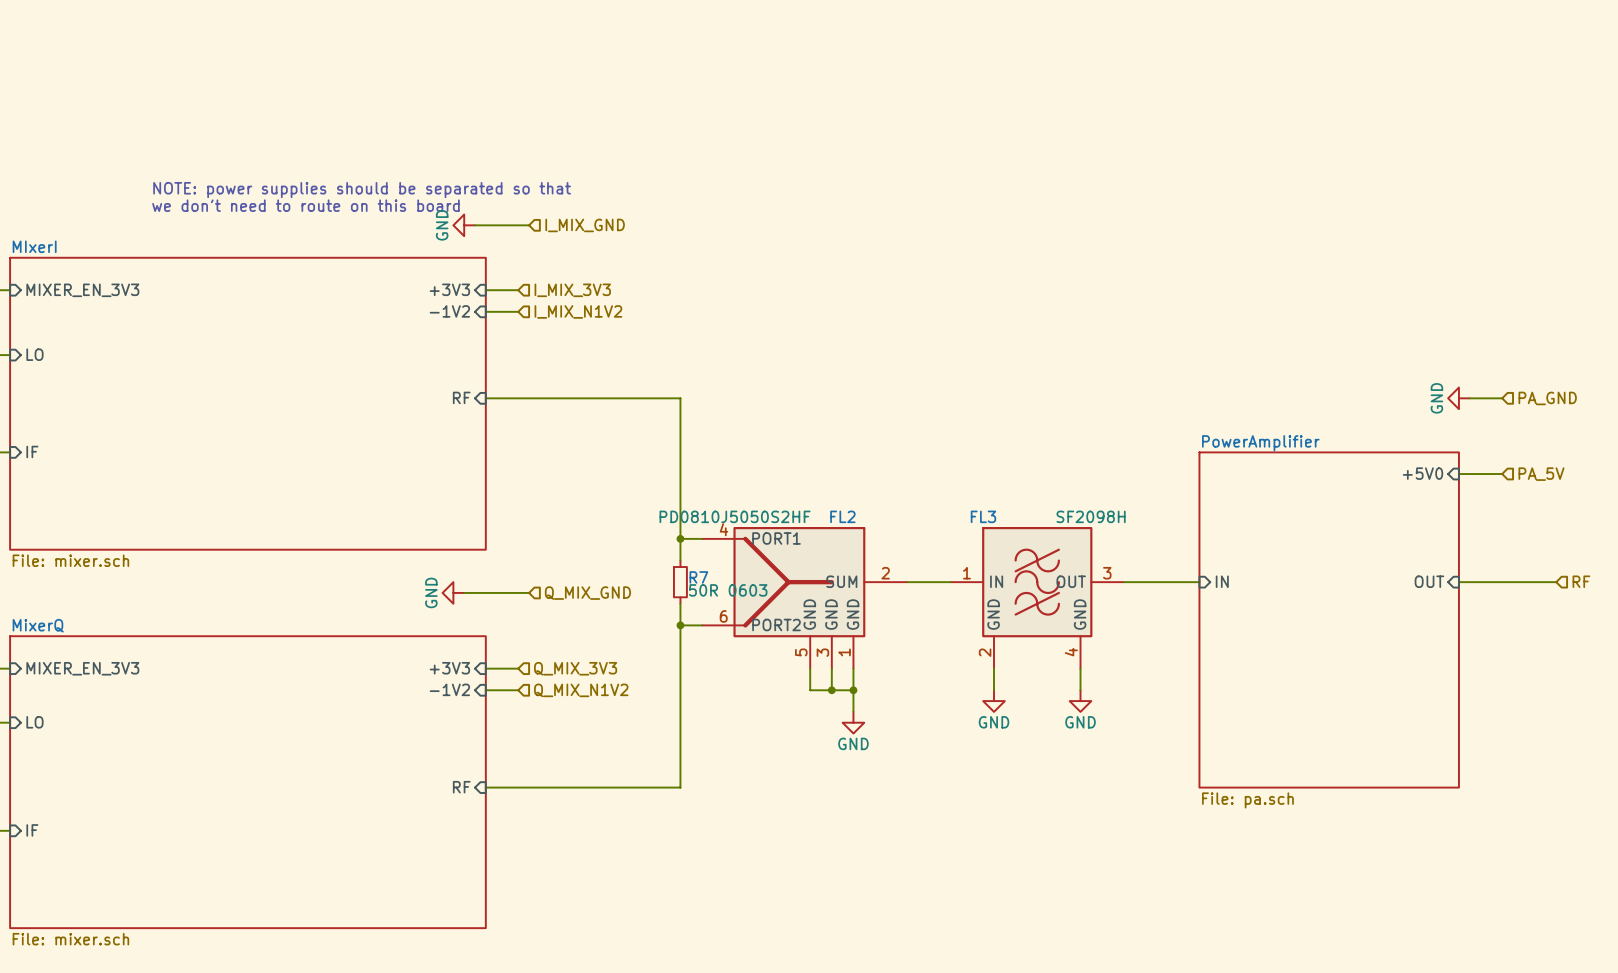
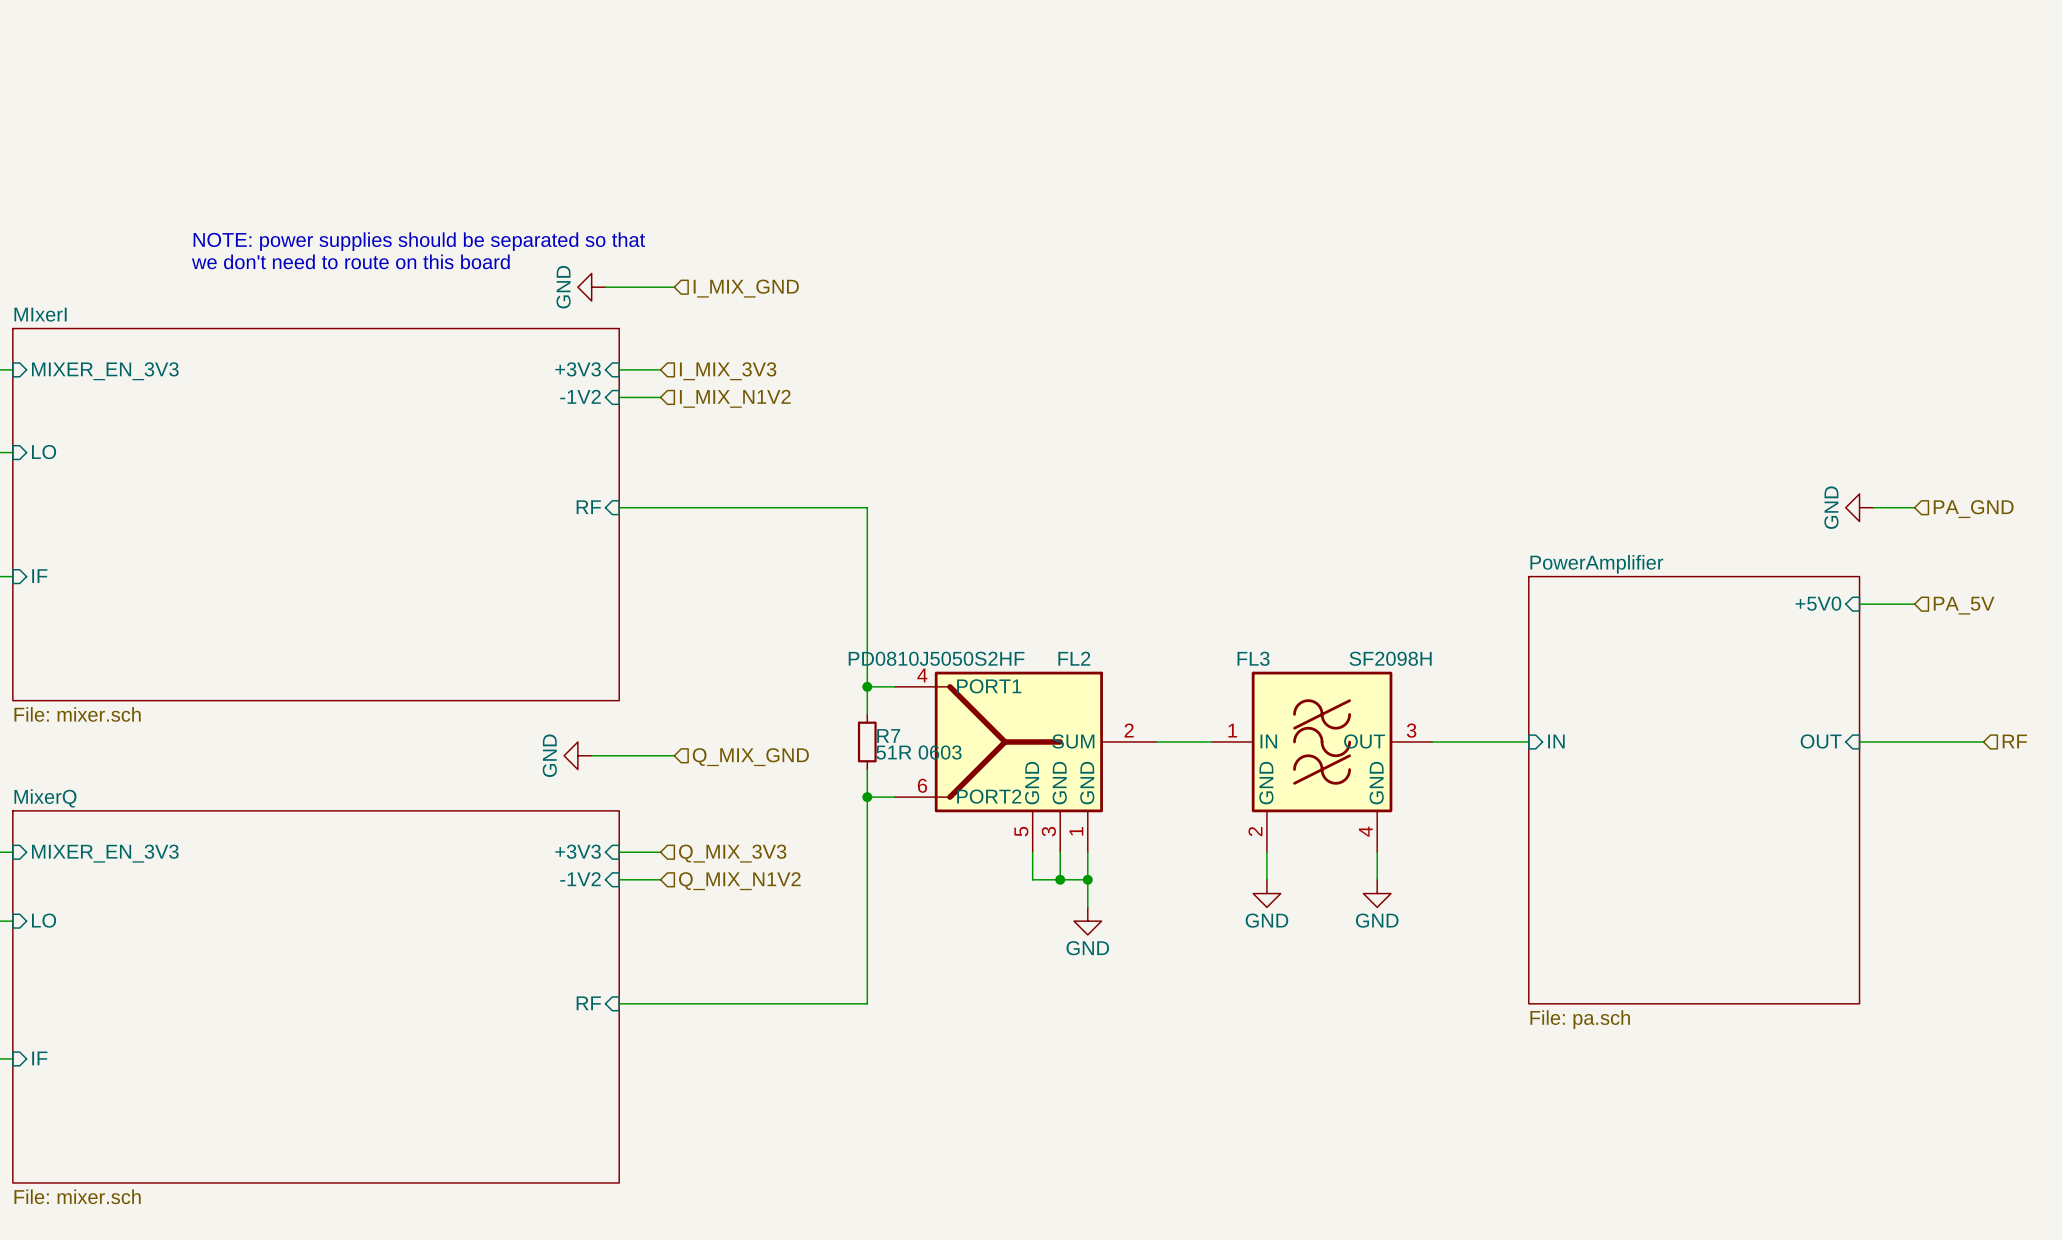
R7 value: 50R 0603 (728, 590) -> 51R 0603 (918, 752)

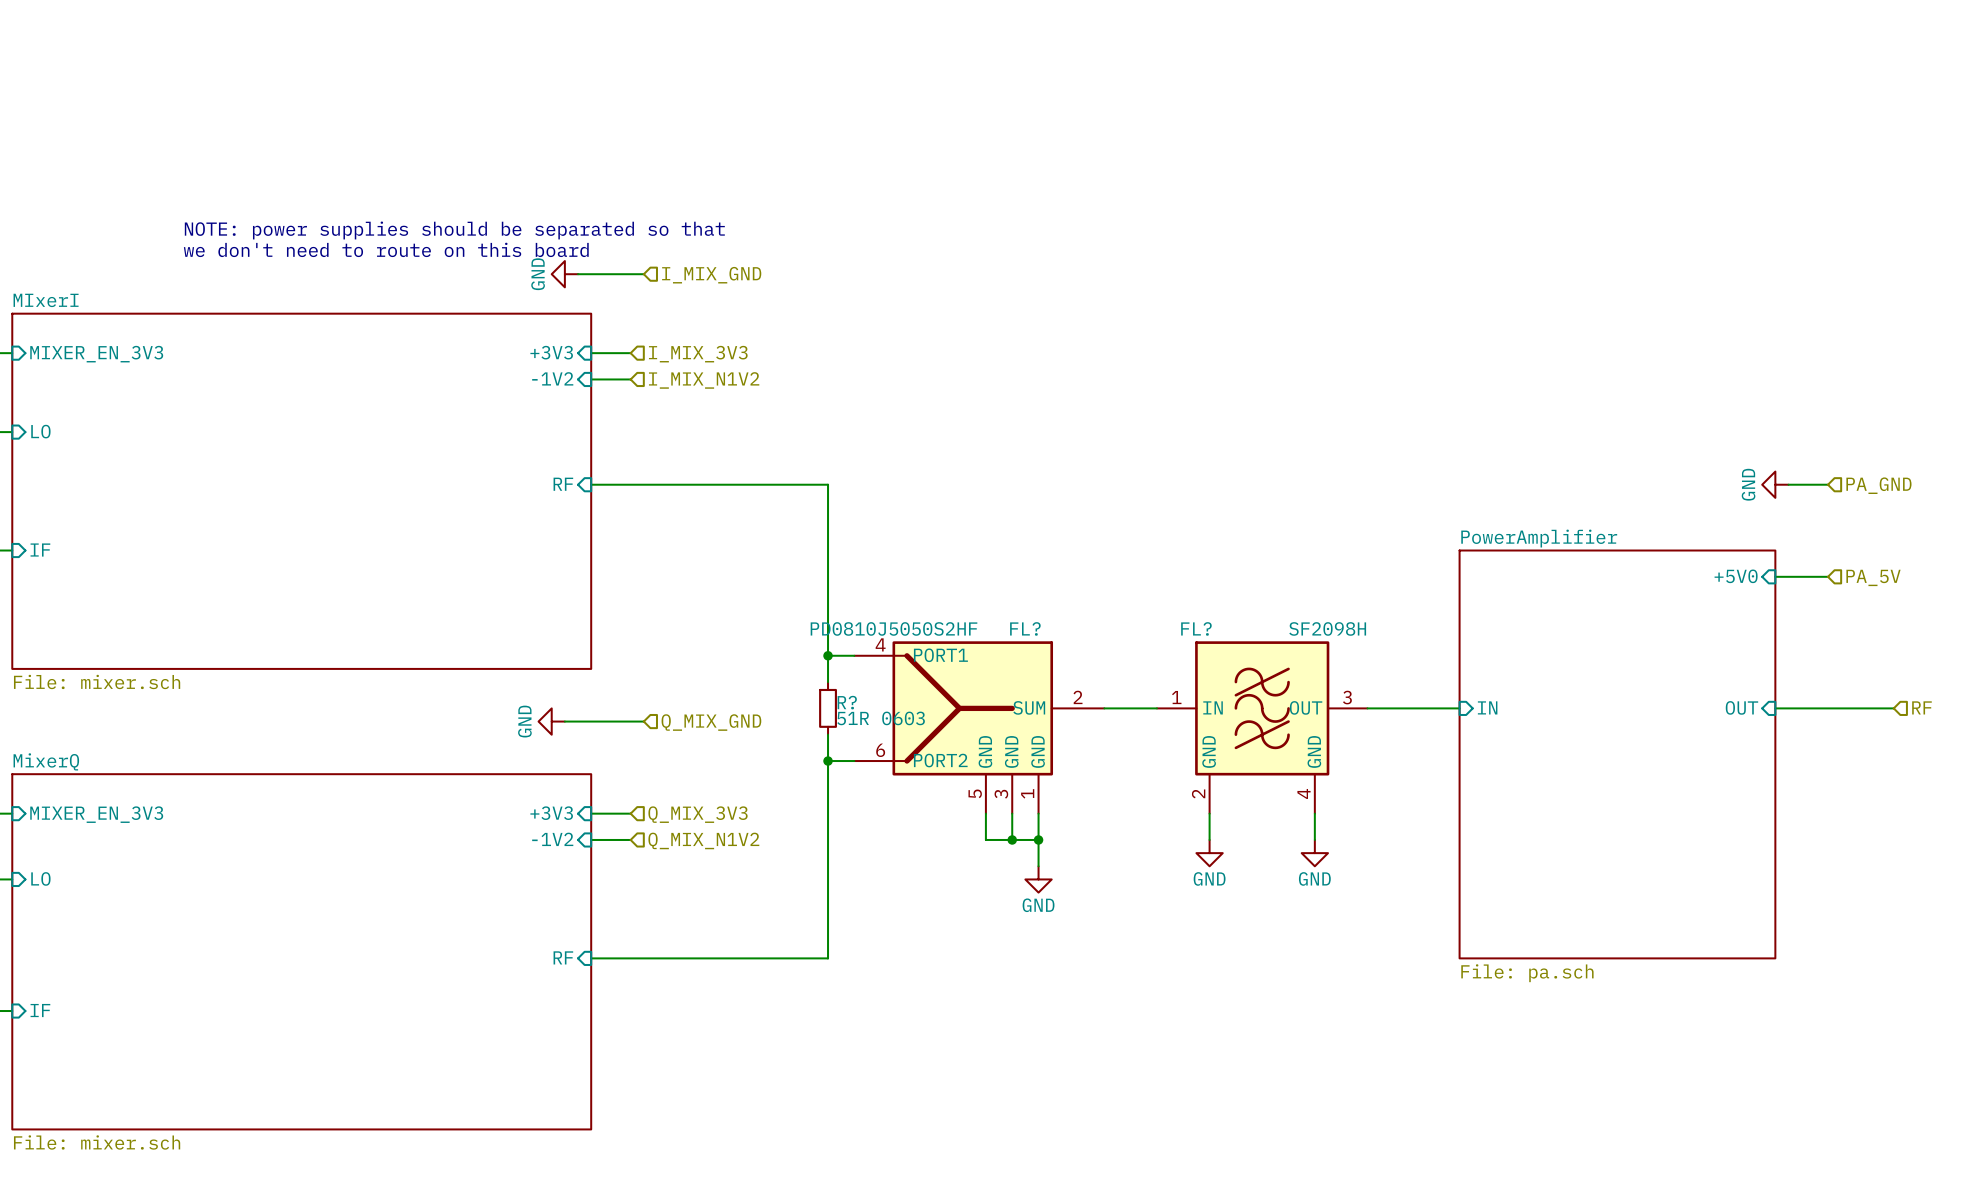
FL2 name: FL2 (1074, 658) -> FL? (1025, 628)
FL3 name: FL3 (1253, 658) -> FL? (1196, 628)
R7 name: R7 (888, 735) -> R? (847, 702)

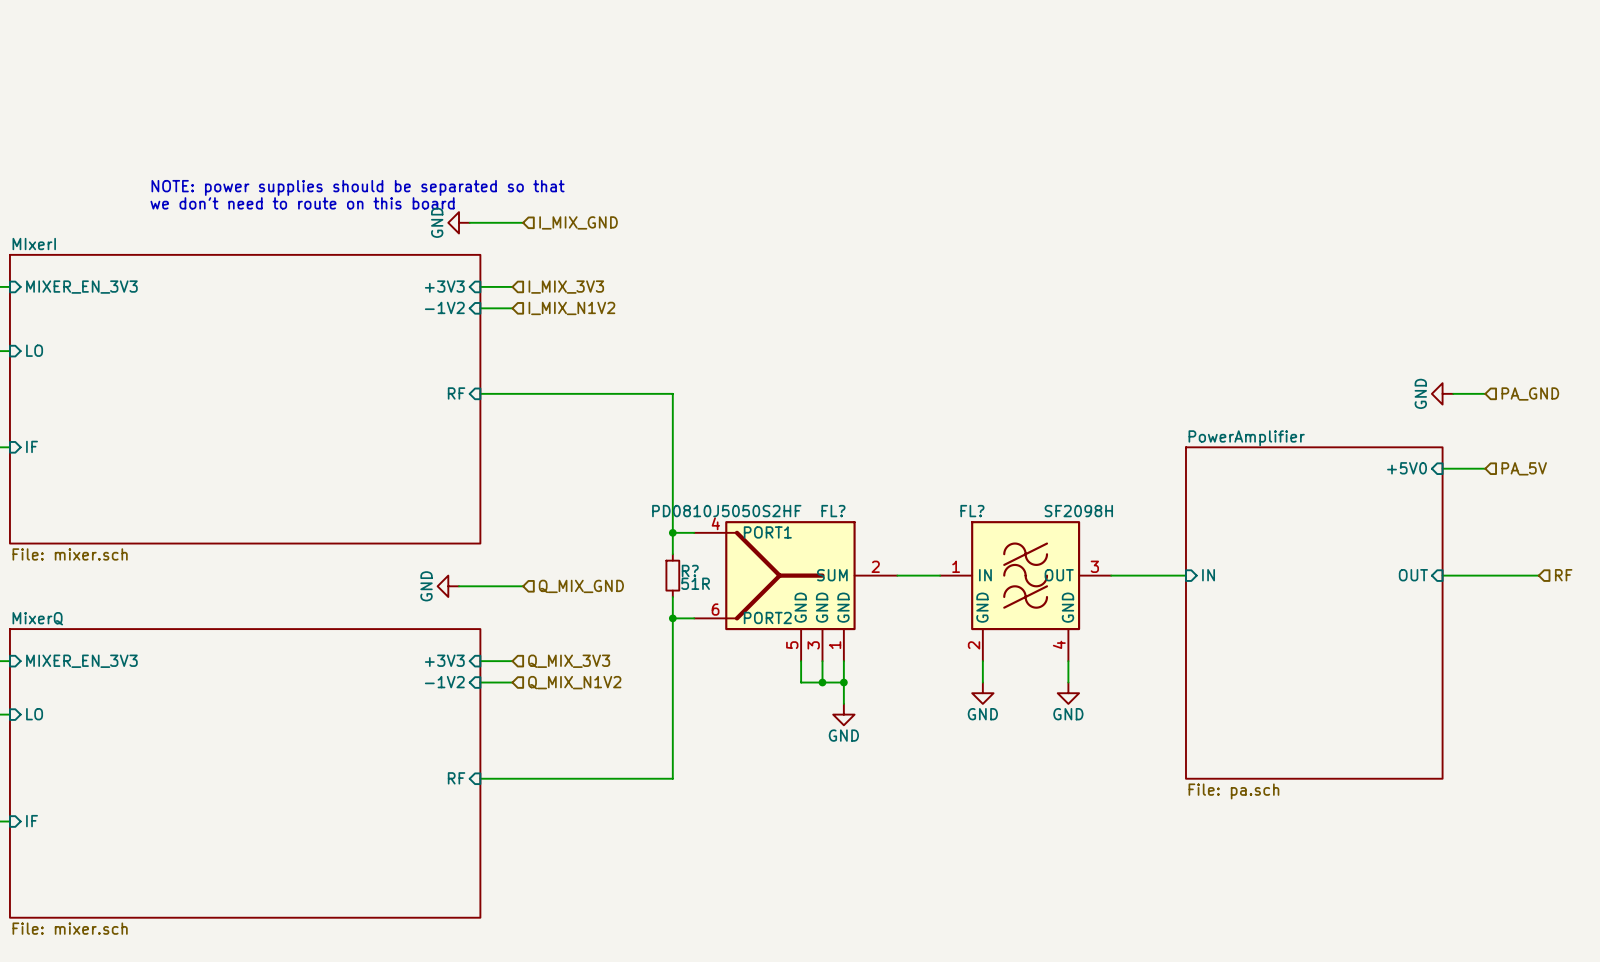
R? value: 51R 0603 (881, 718) -> 51R (695, 583)

